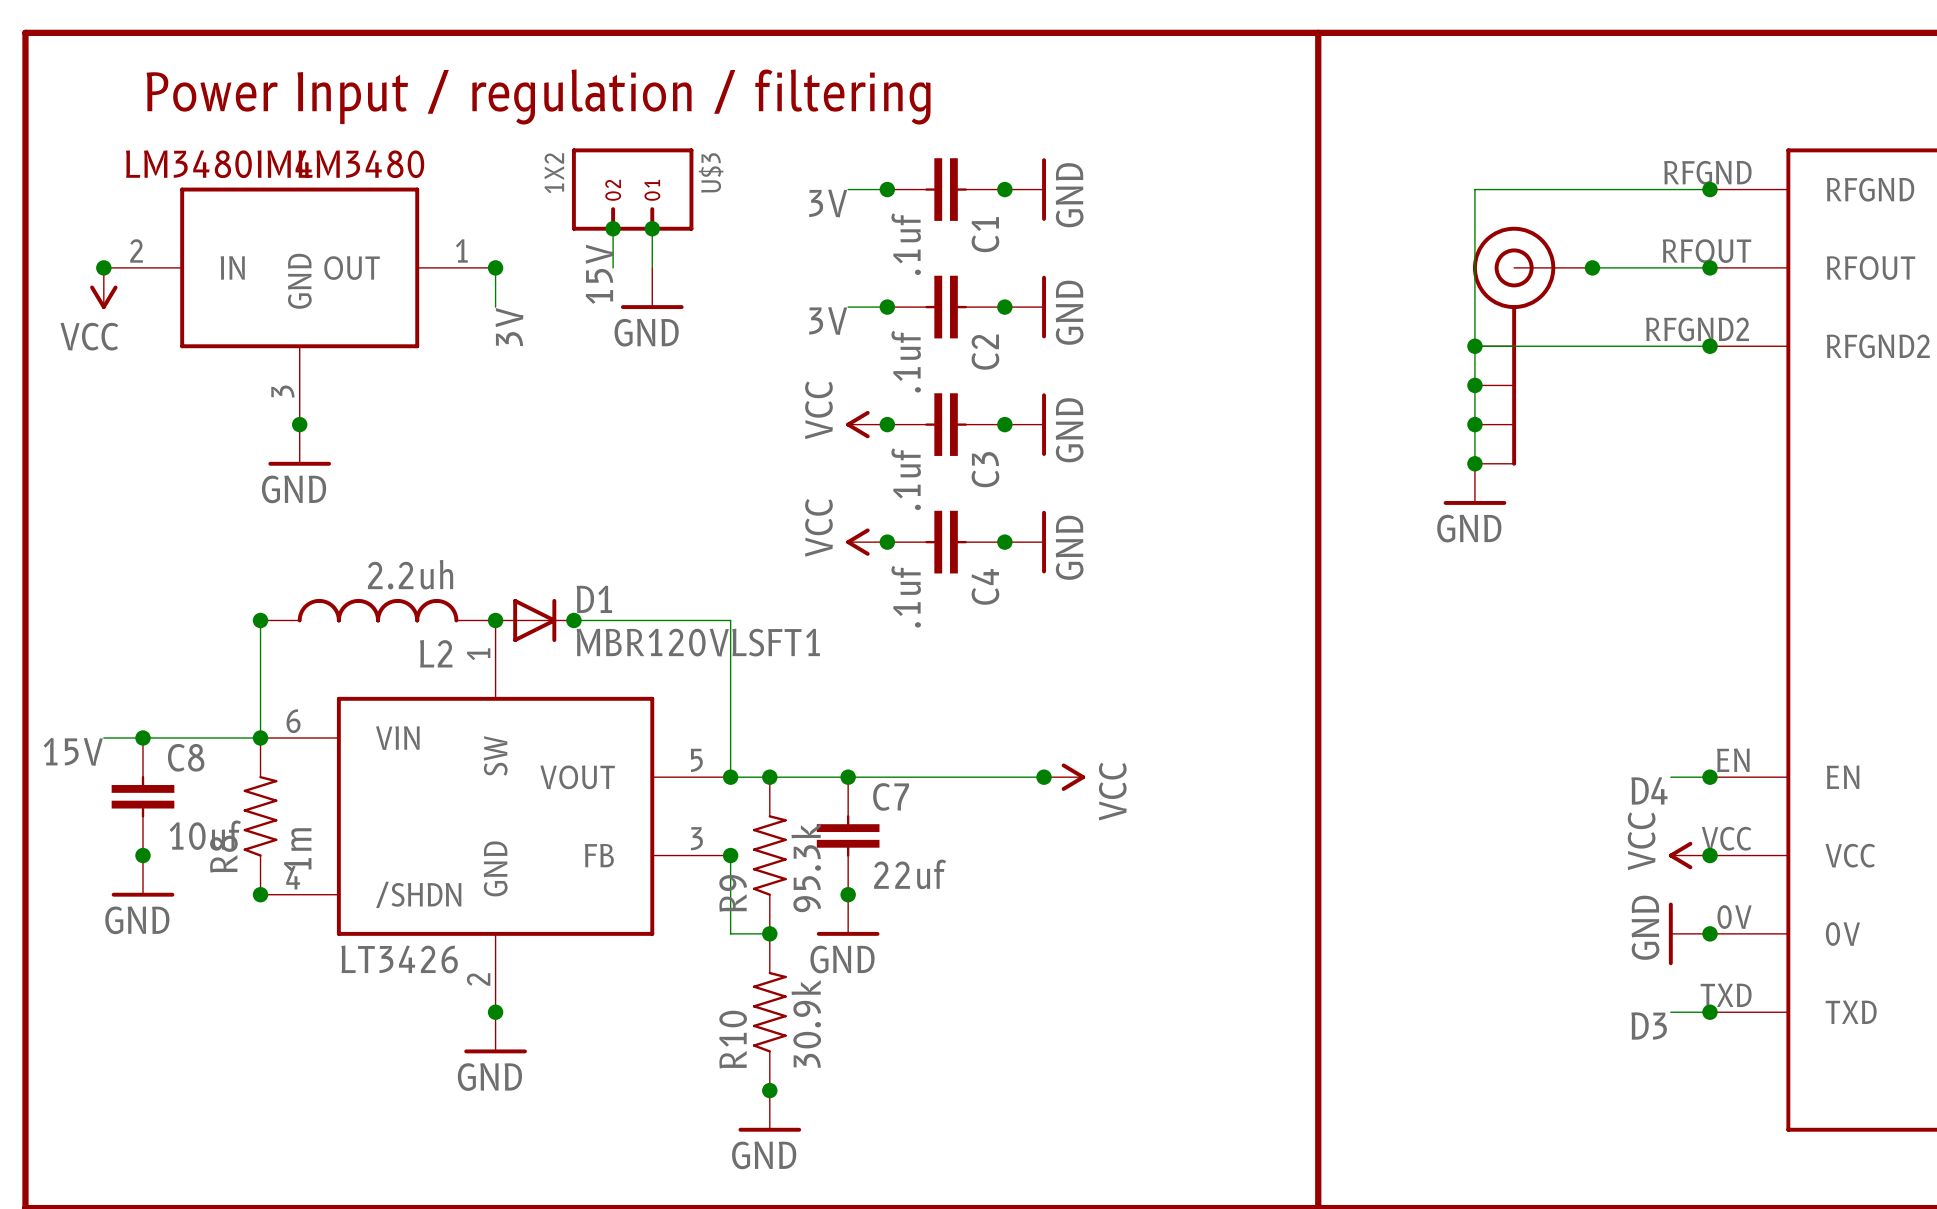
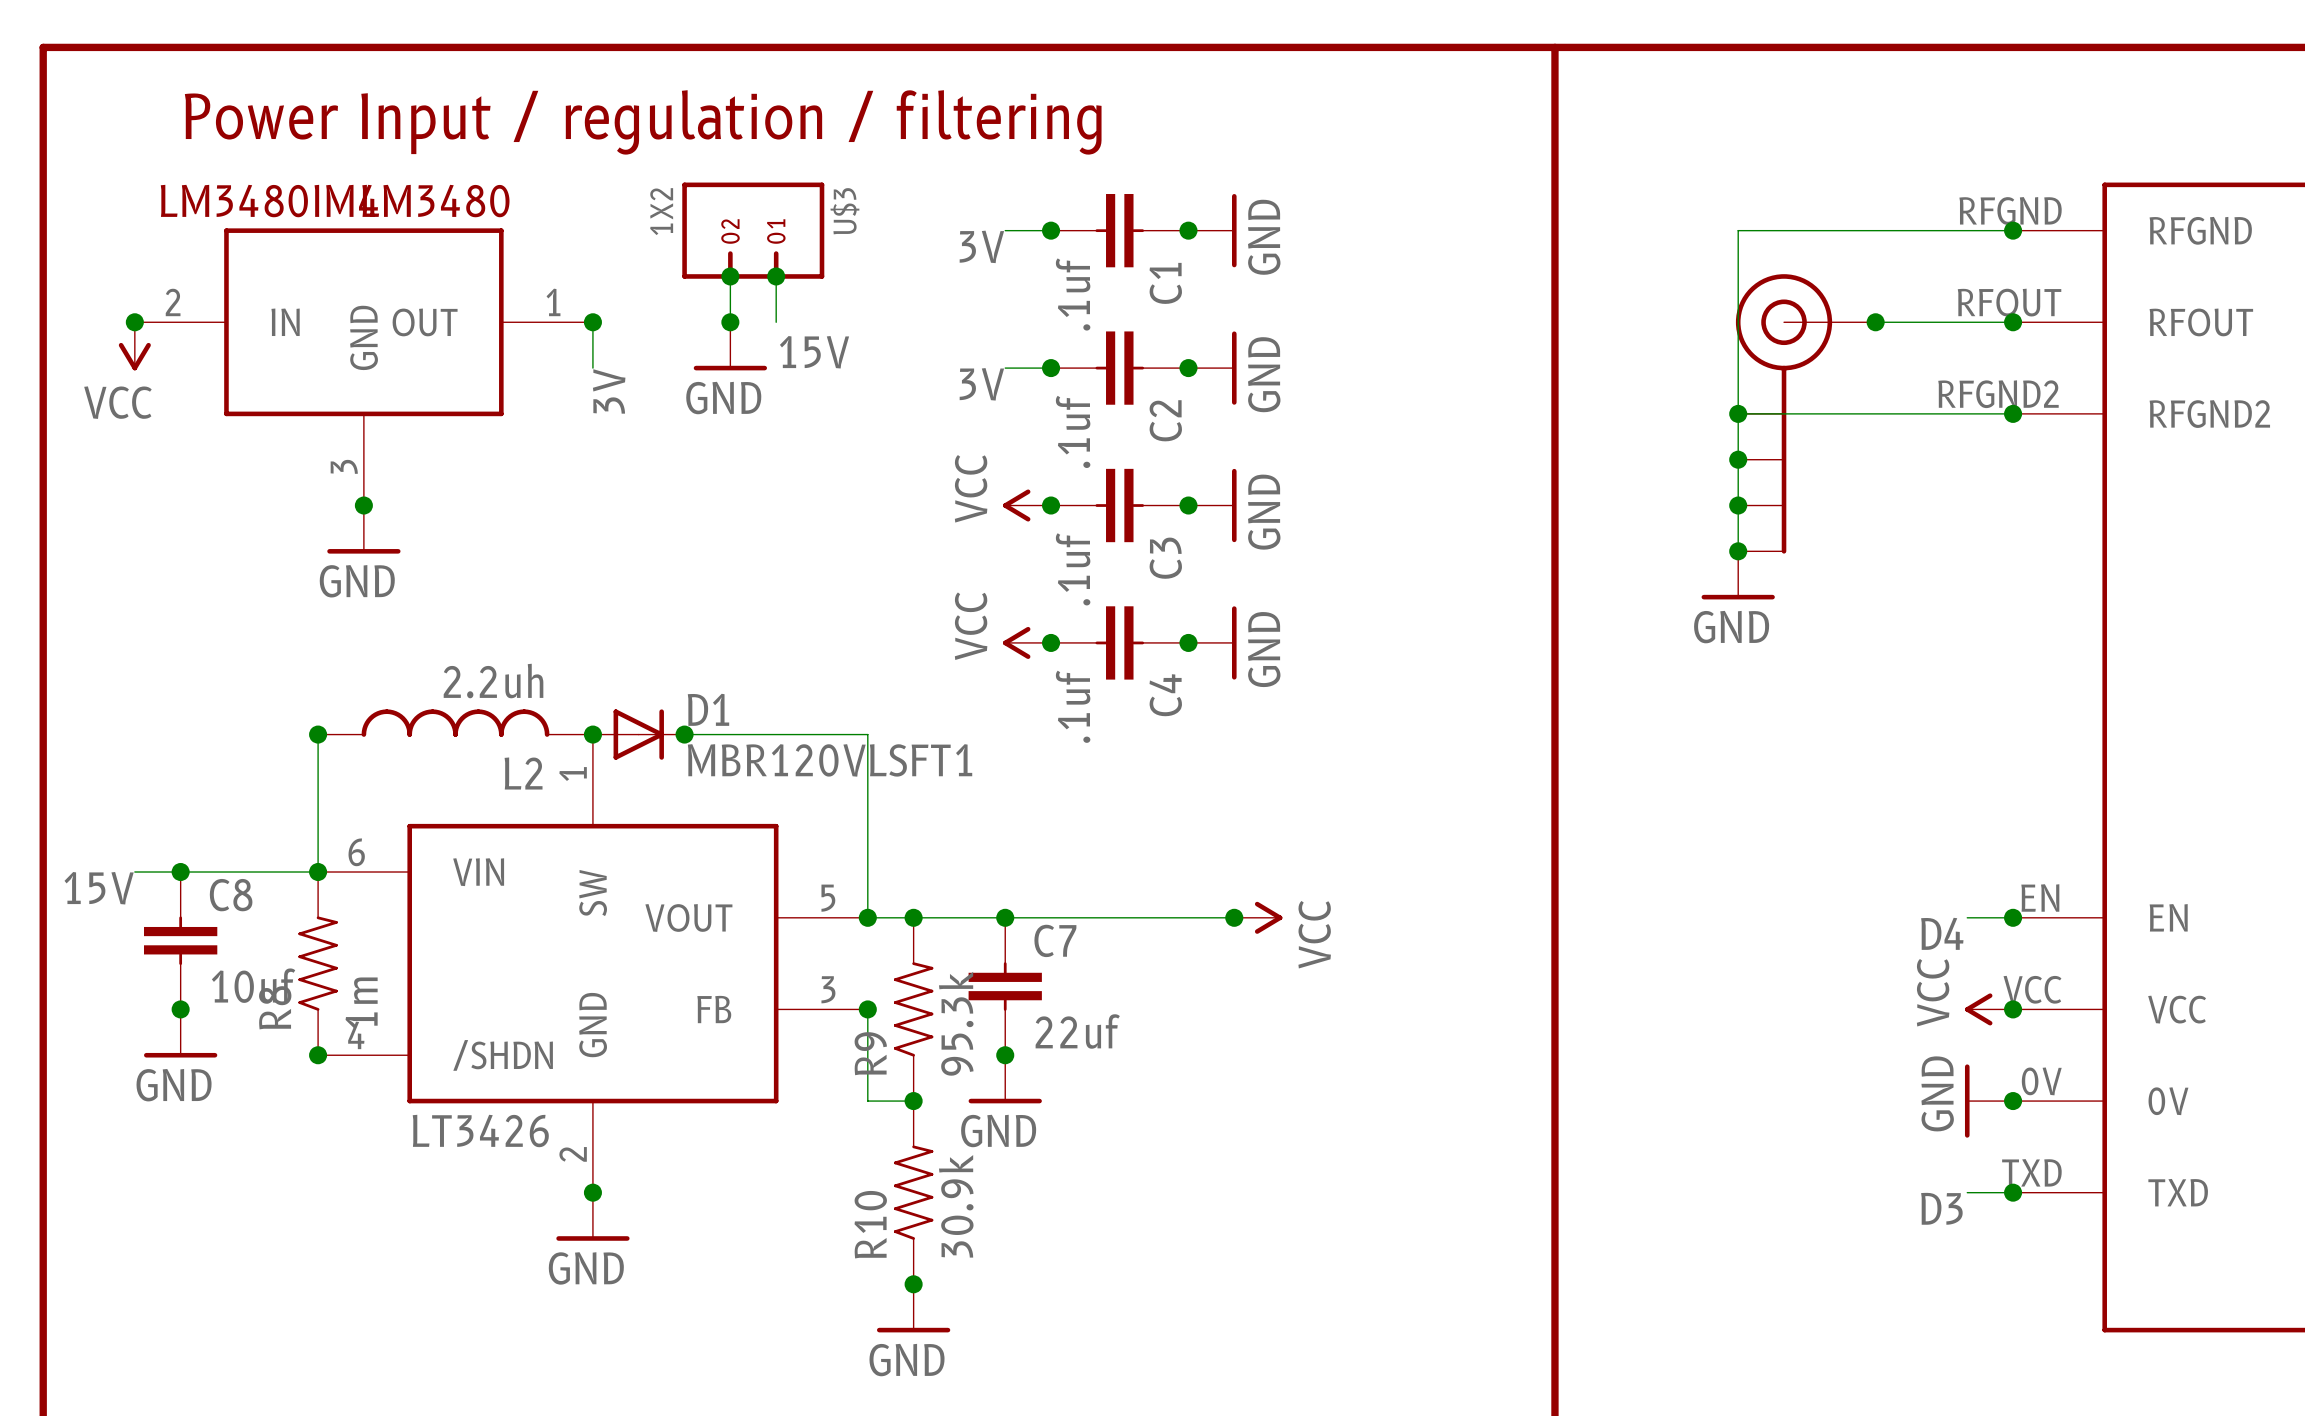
junction: none -> (730, 322)
label rotation: 0° (599, 274) -> 90° clockwise (814, 352)
label position: 15V (599, 274) -> 15V (814, 352)
power symbol position: GND (652, 288) -> GND (730, 346)

